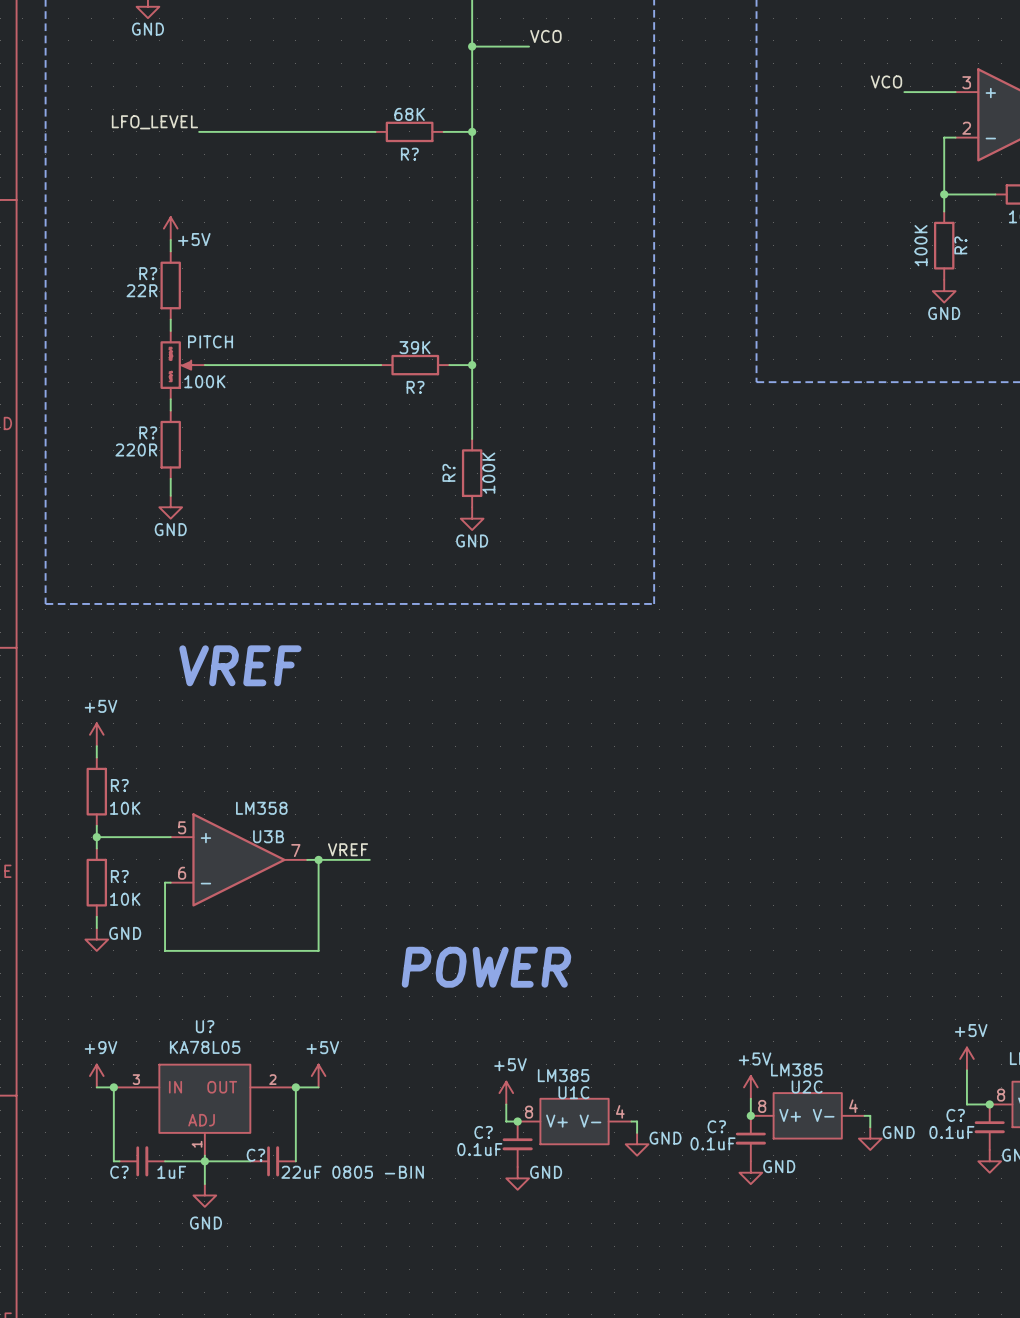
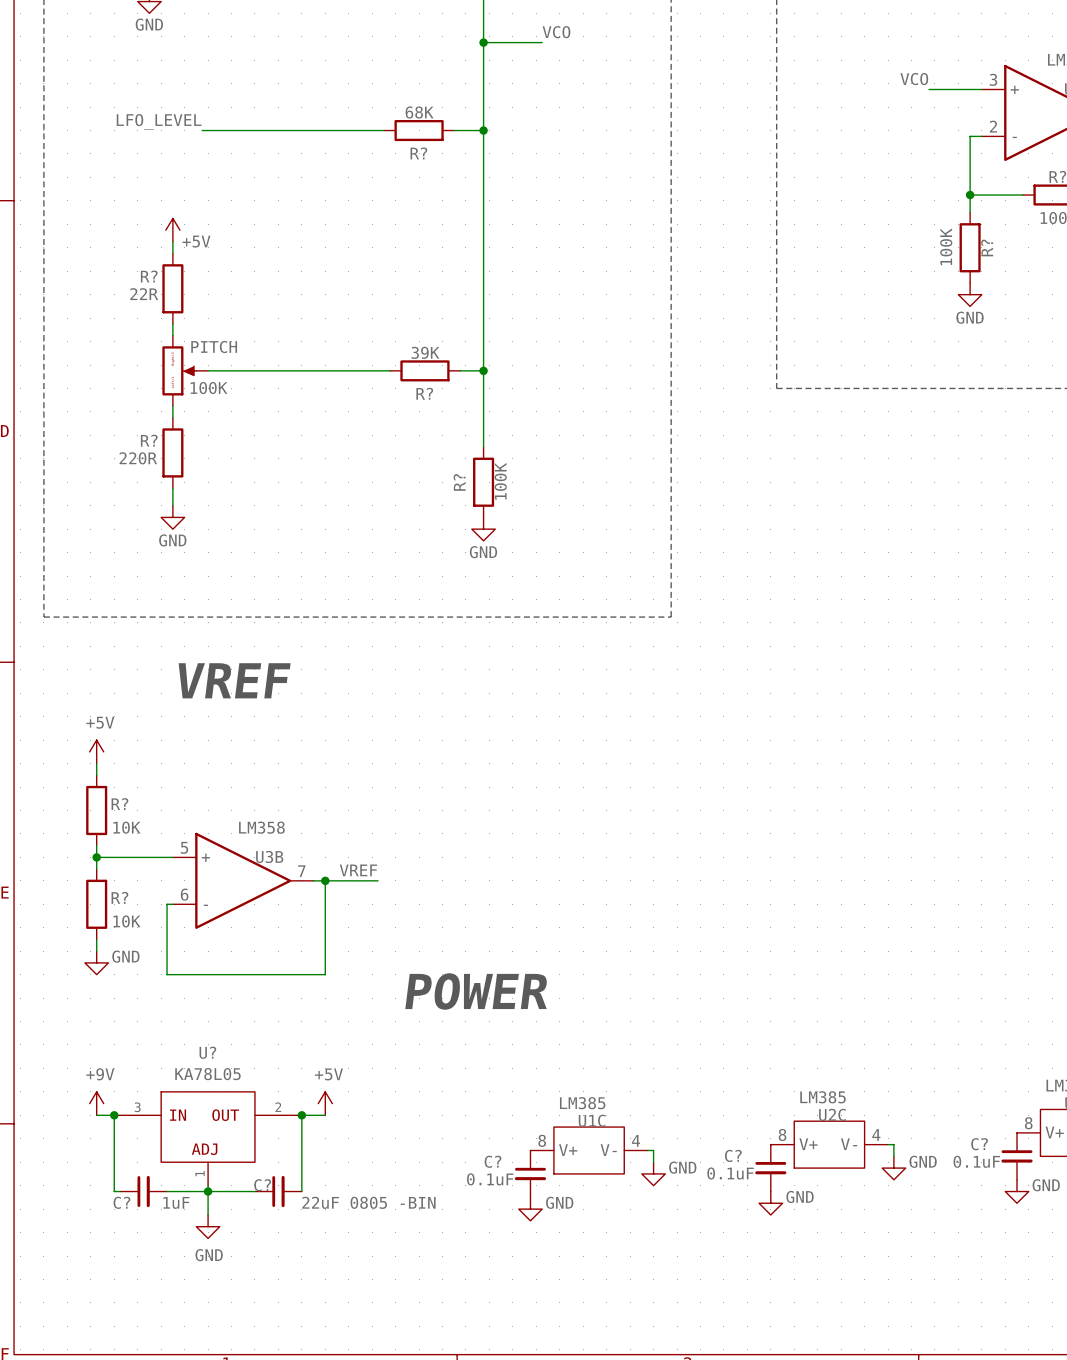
power symbol: +5V (966, 1058) -> none
wire: (966, 1070) (966, 1104) (989, 1104) -> none
power symbol: +5V (750, 1087) -> none
power symbol: +5V (506, 1093) -> none
wire: (750, 1098) (750, 1115) -> none
wire: (506, 1104) (506, 1121) (517, 1121) -> none
junction: (989, 1104) -> none
junction: (750, 1115) -> none
junction: (517, 1121) -> none

